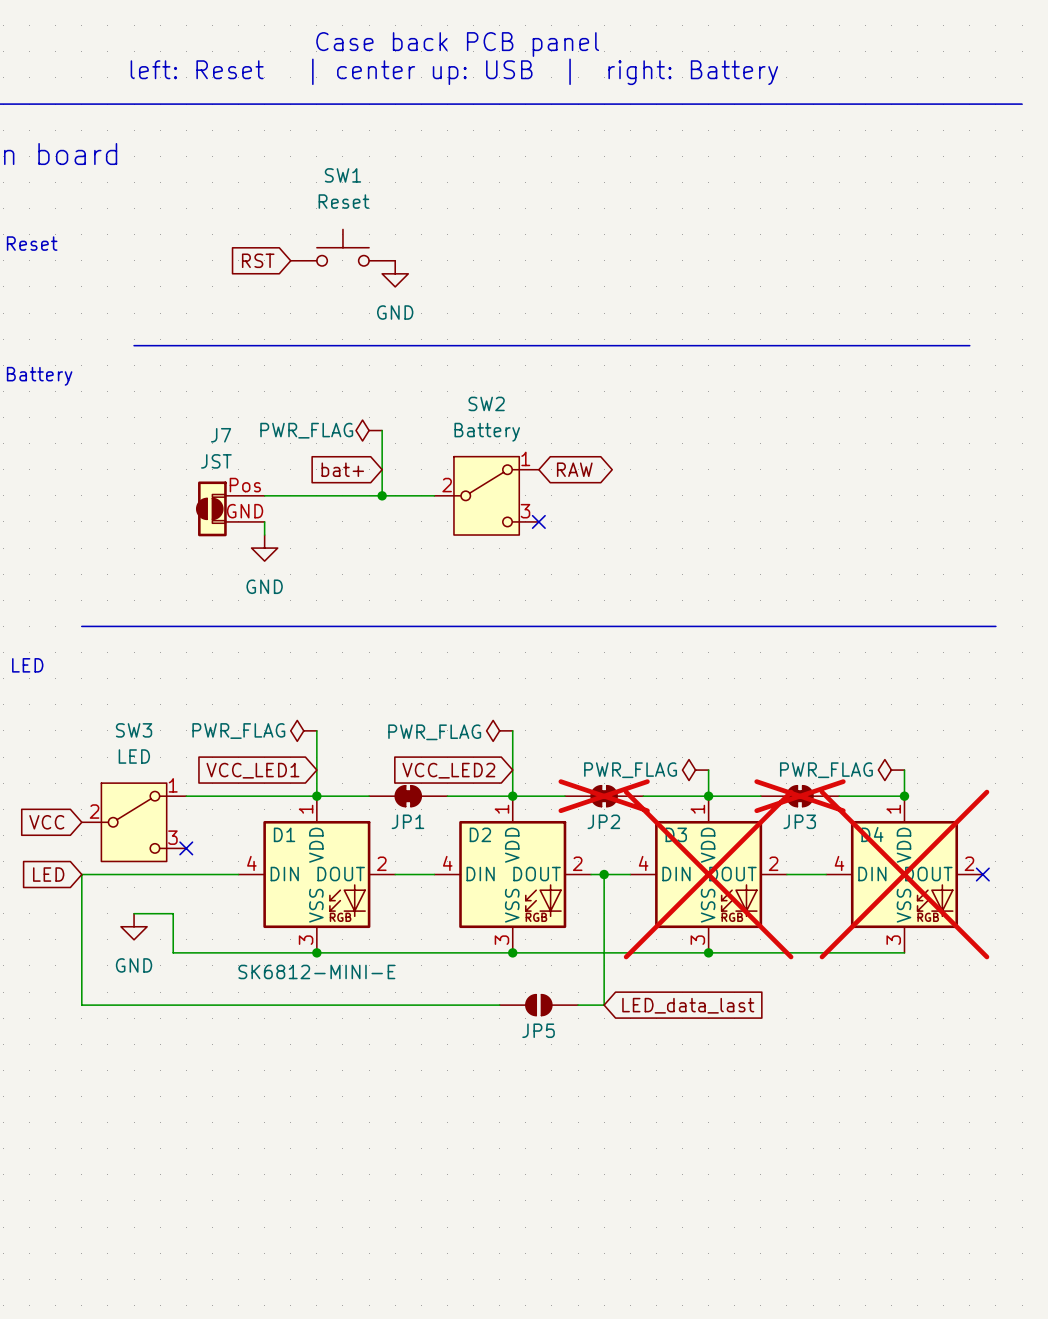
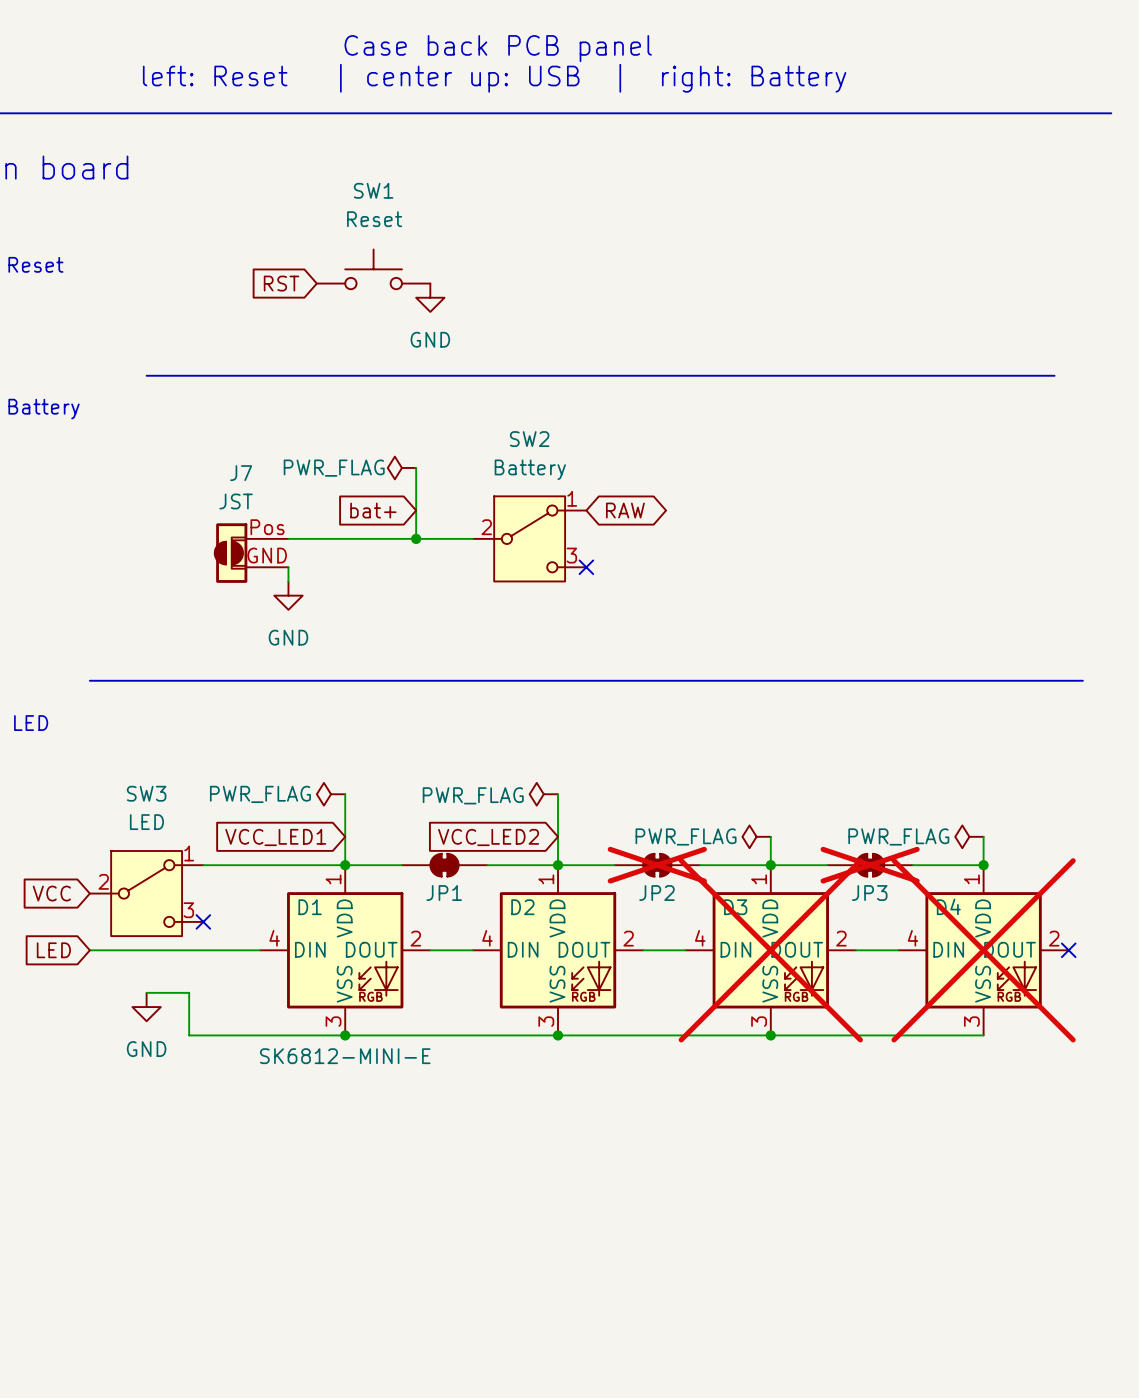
wire: (81, 874) (81, 1005) (499, 1005) -> none
wire: (604, 874) (604, 1005) (578, 1005) -> none
junction: (604, 874) -> none
JP5: (538, 1005) -> none
global label: LED_data_last (688, 1005) -> none

